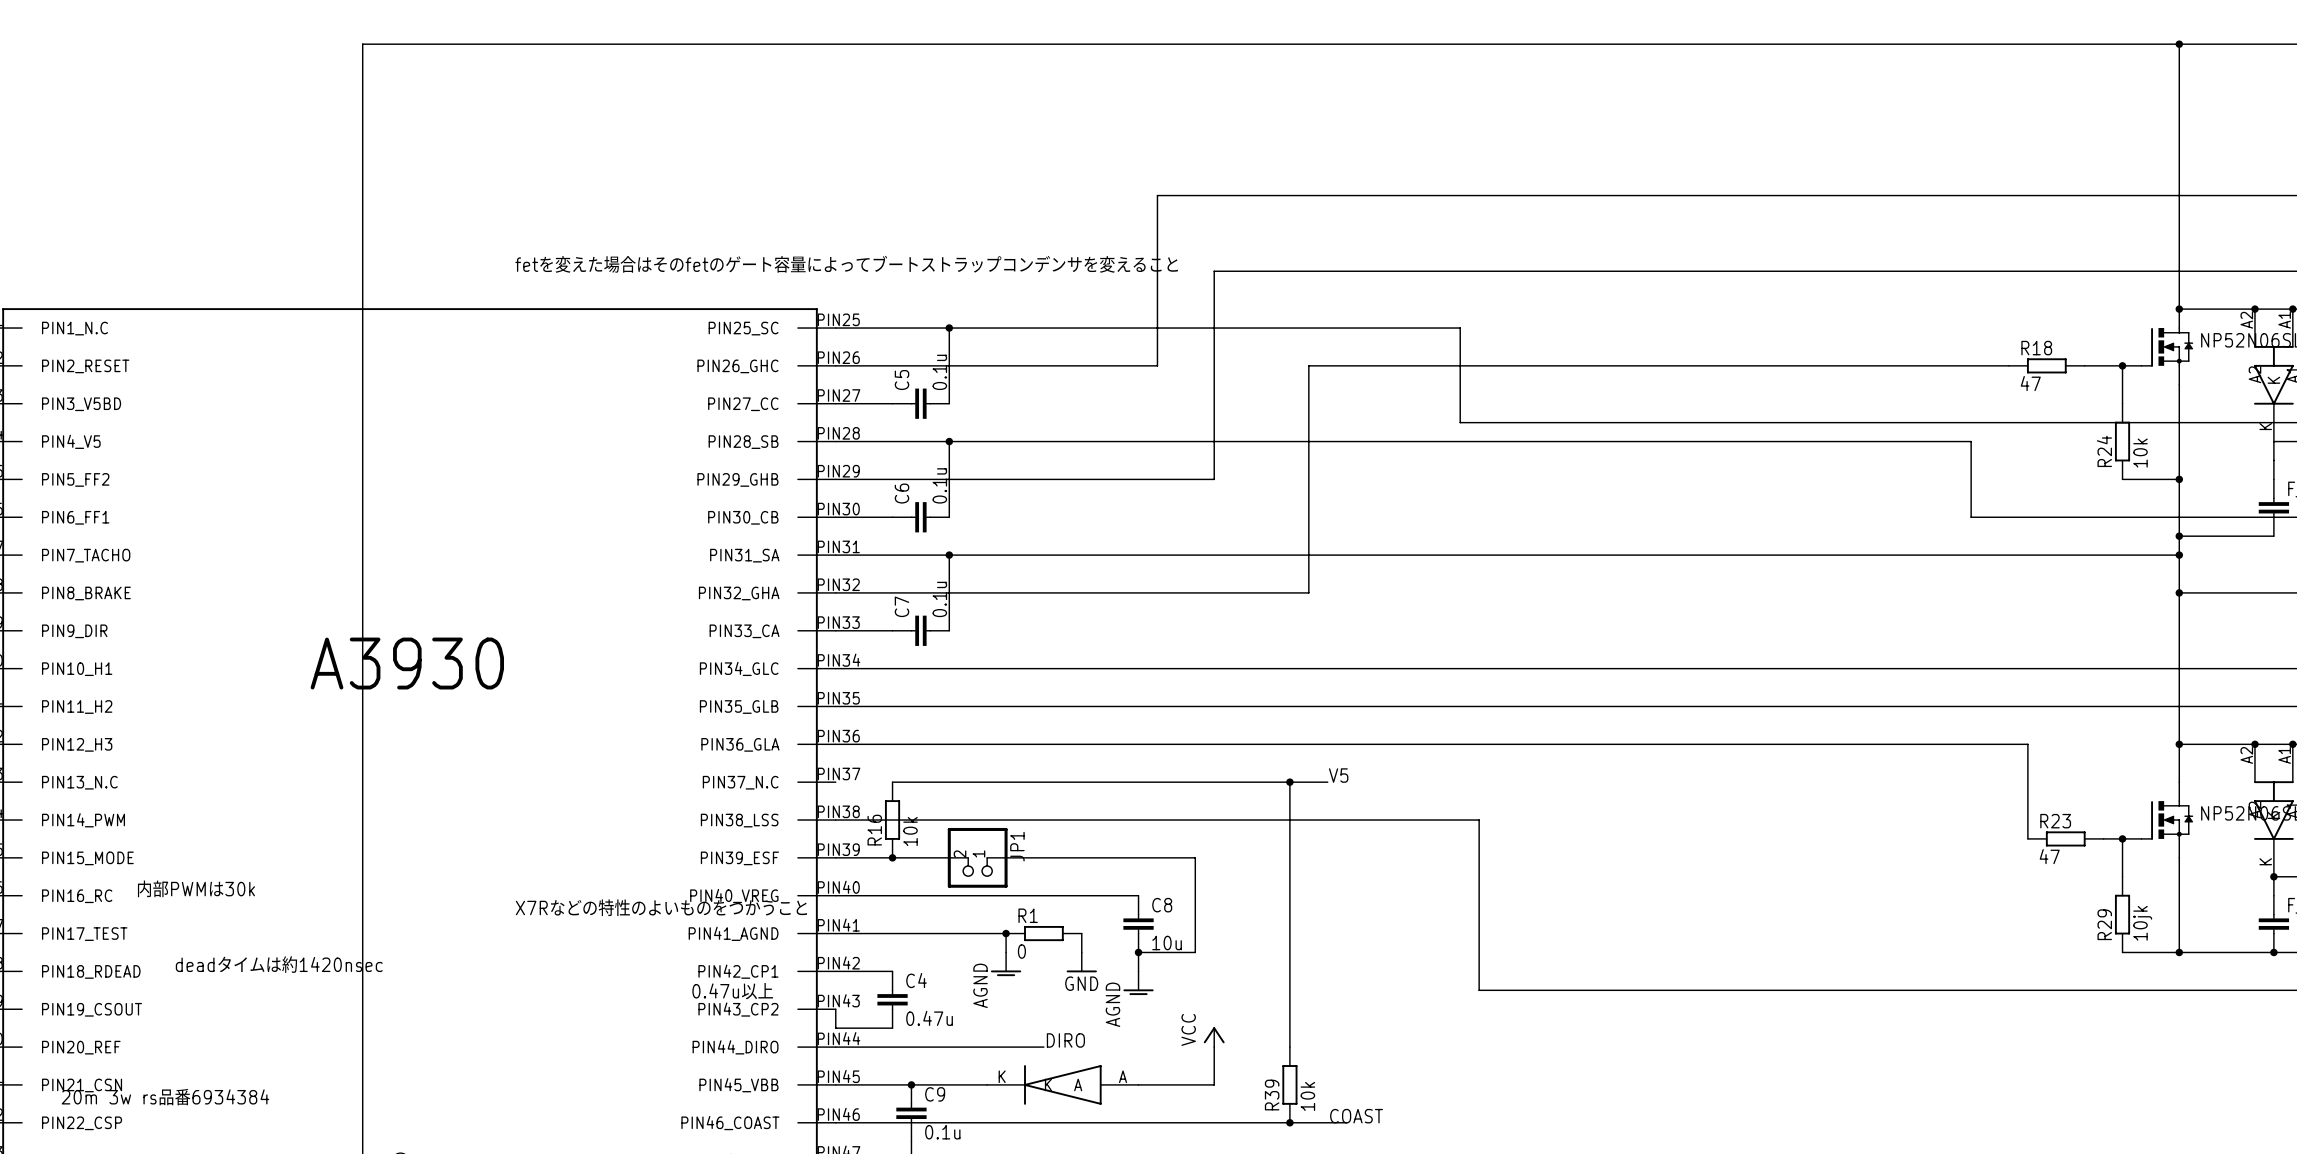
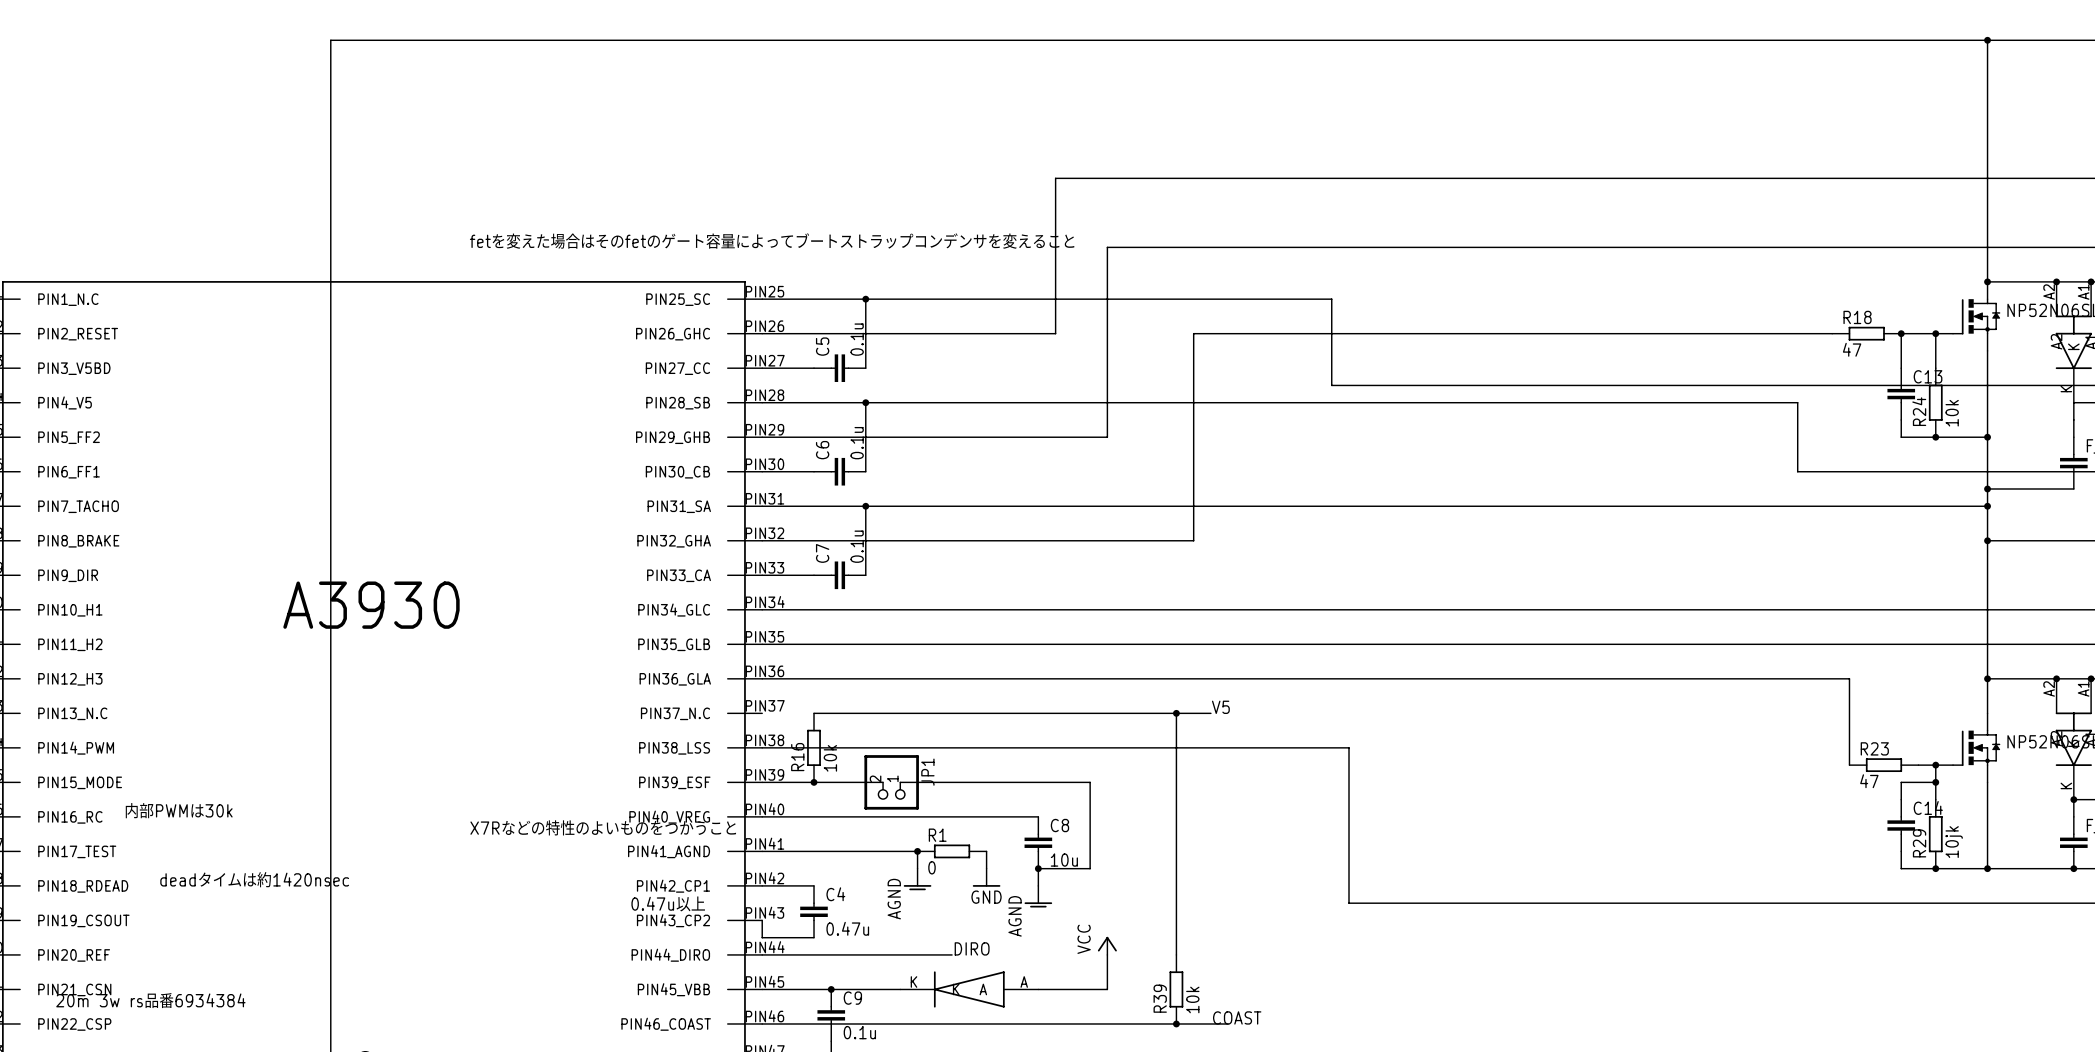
wire: none -> (1901, 333) (1901, 368)
junction: none -> (1901, 333)
C13: none -> (1901, 394)
wire: none -> (1901, 419) (1901, 437) (1935, 437)
junction: none -> (1935, 437)
wire: none -> (1935, 782) (1901, 782) (1901, 799)
junction: none -> (1935, 782)
C14: none -> (1901, 825)
wire: none -> (1901, 851) (1901, 868) (1935, 868)
junction: none -> (1935, 868)

